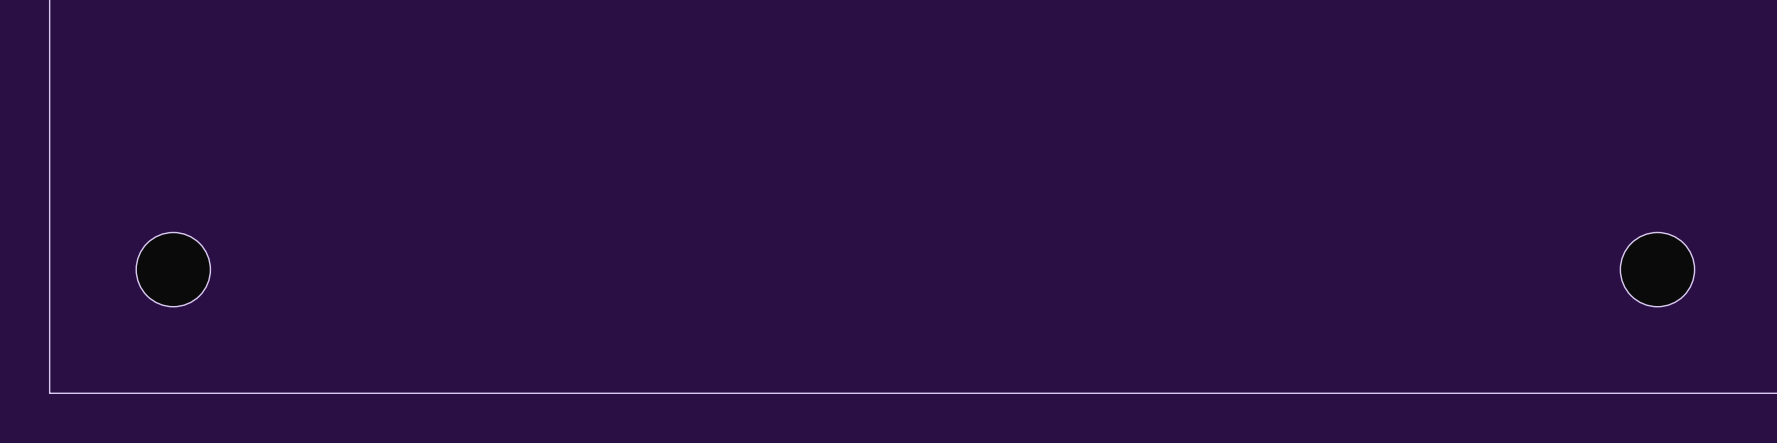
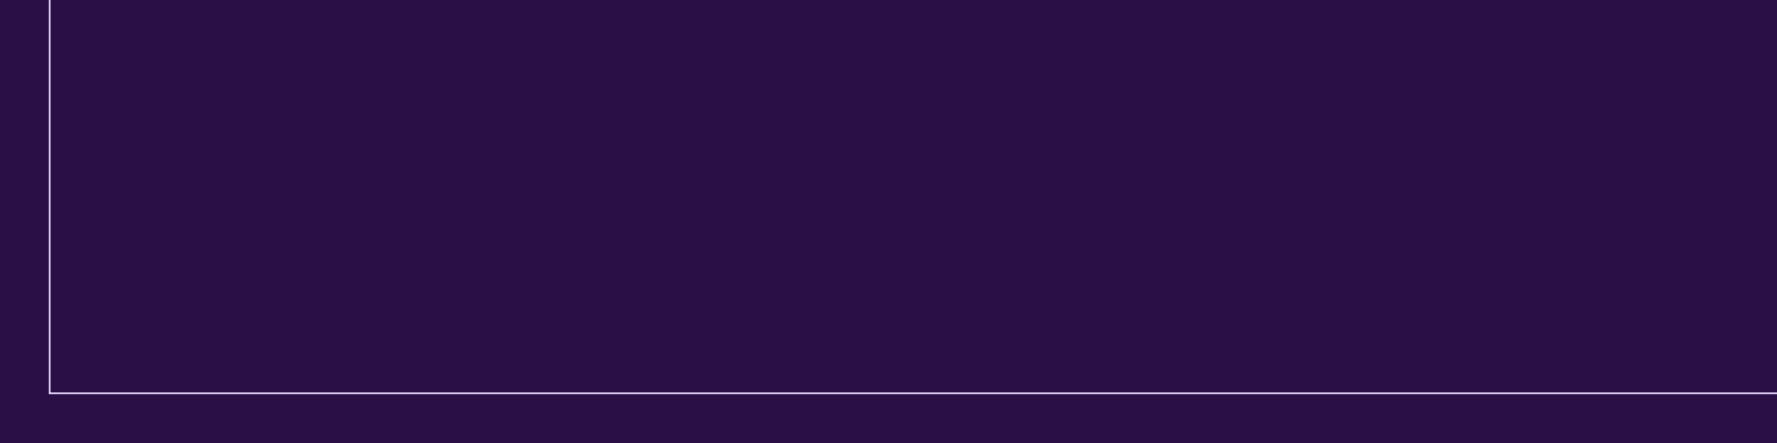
hole: (173, 269) -> none
hole: (1657, 269) -> none

